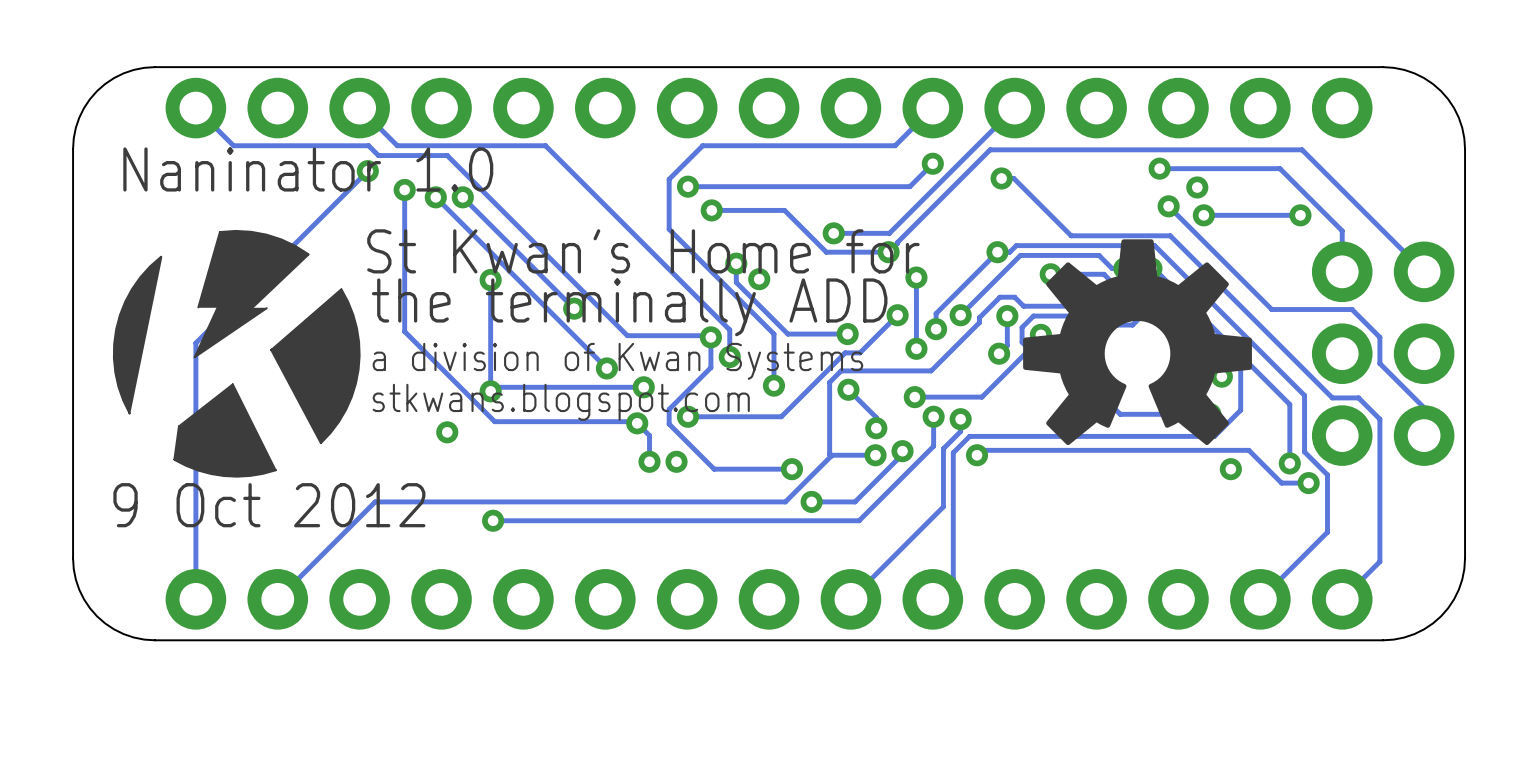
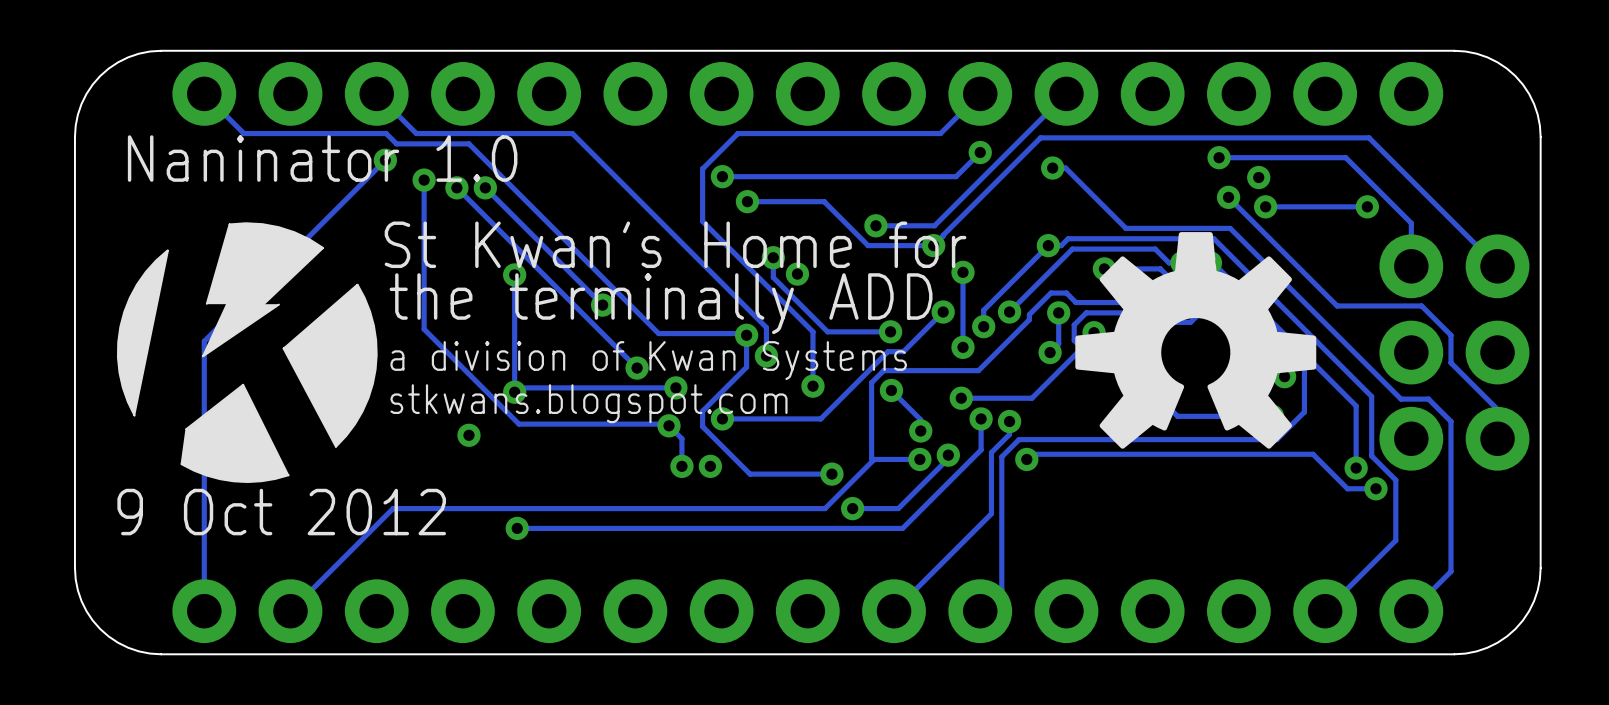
via: (1230, 469) -> none

